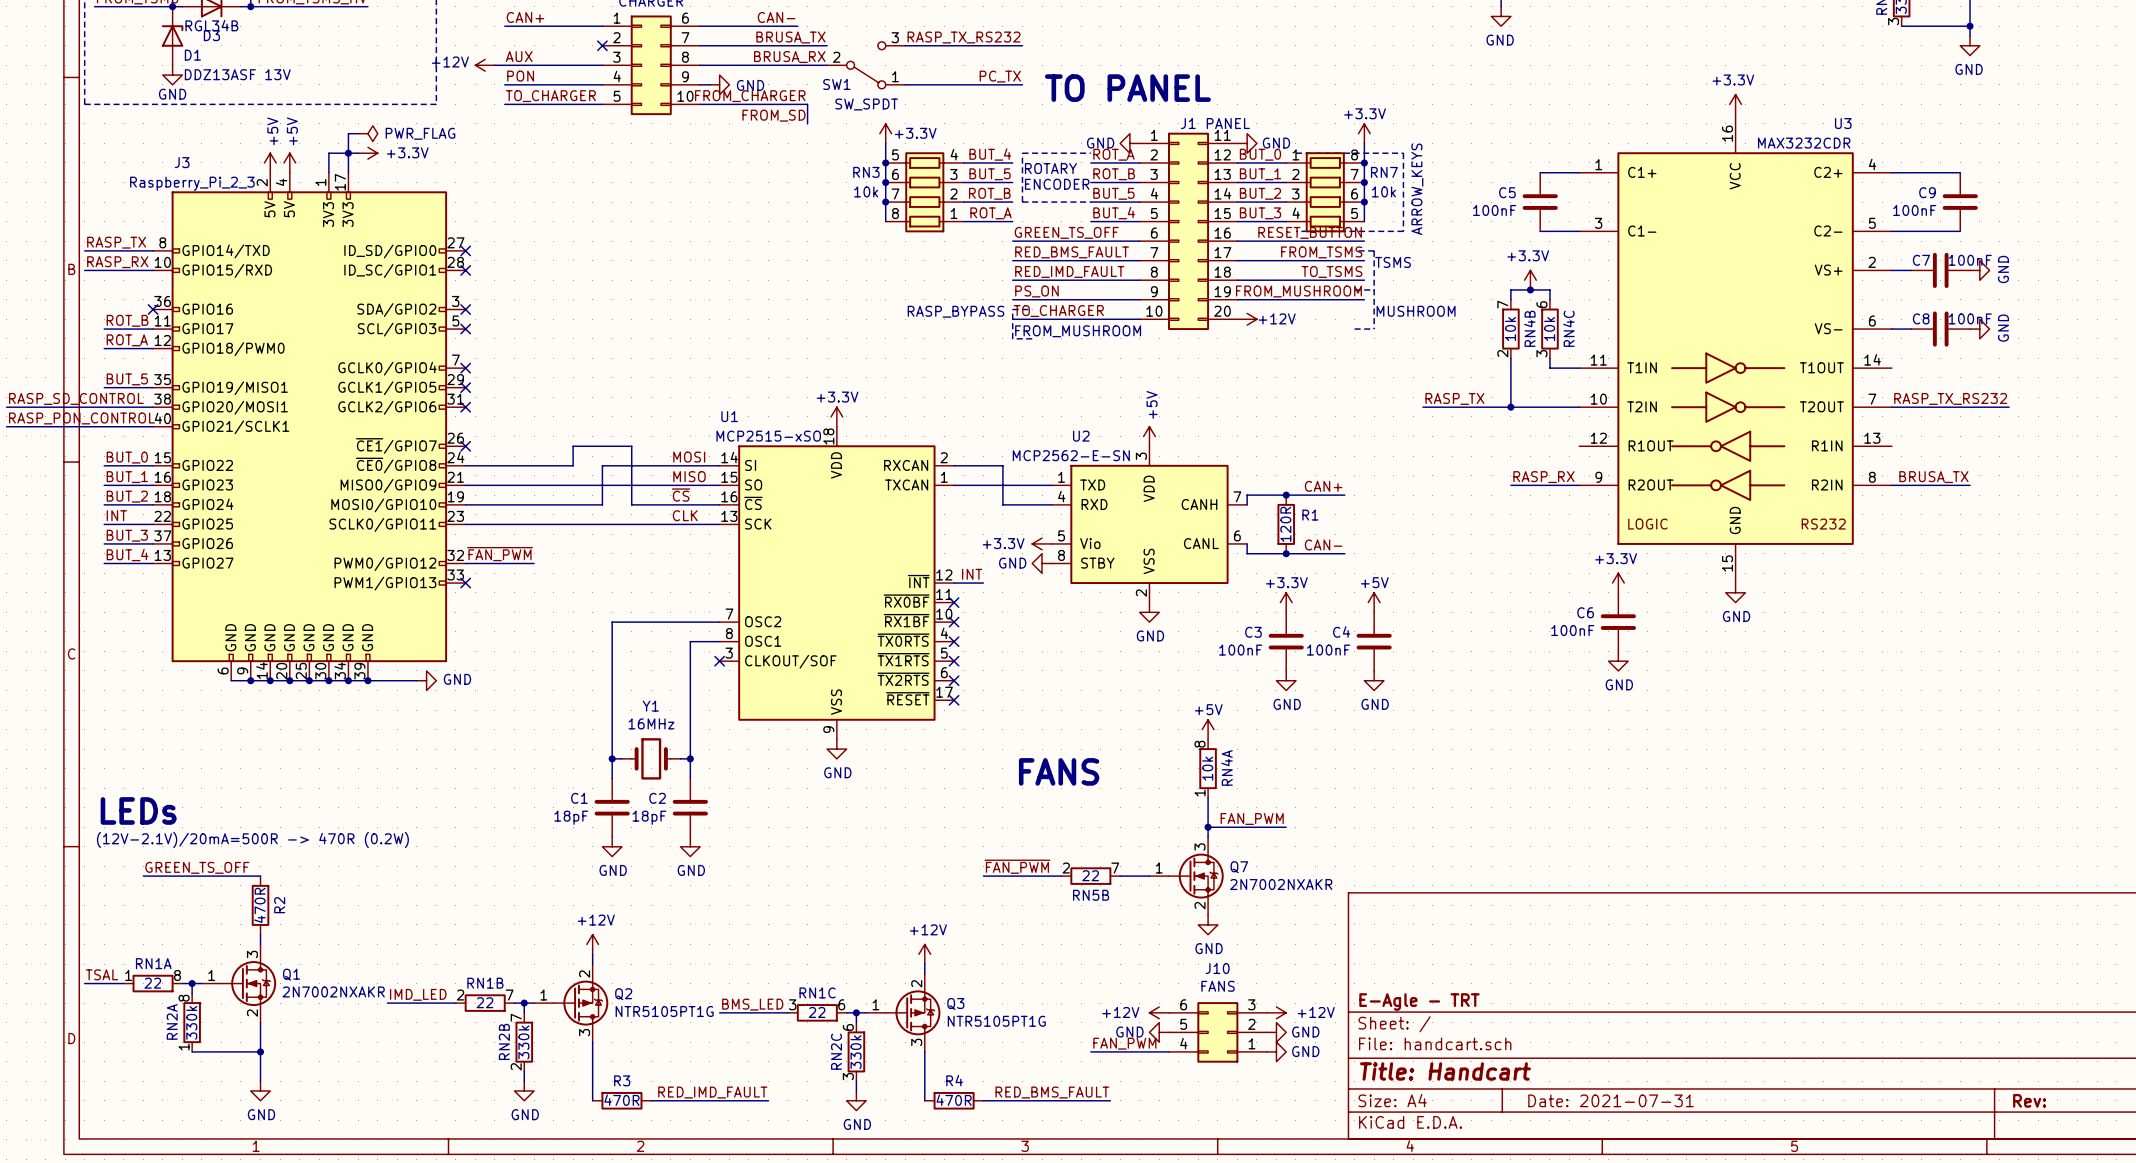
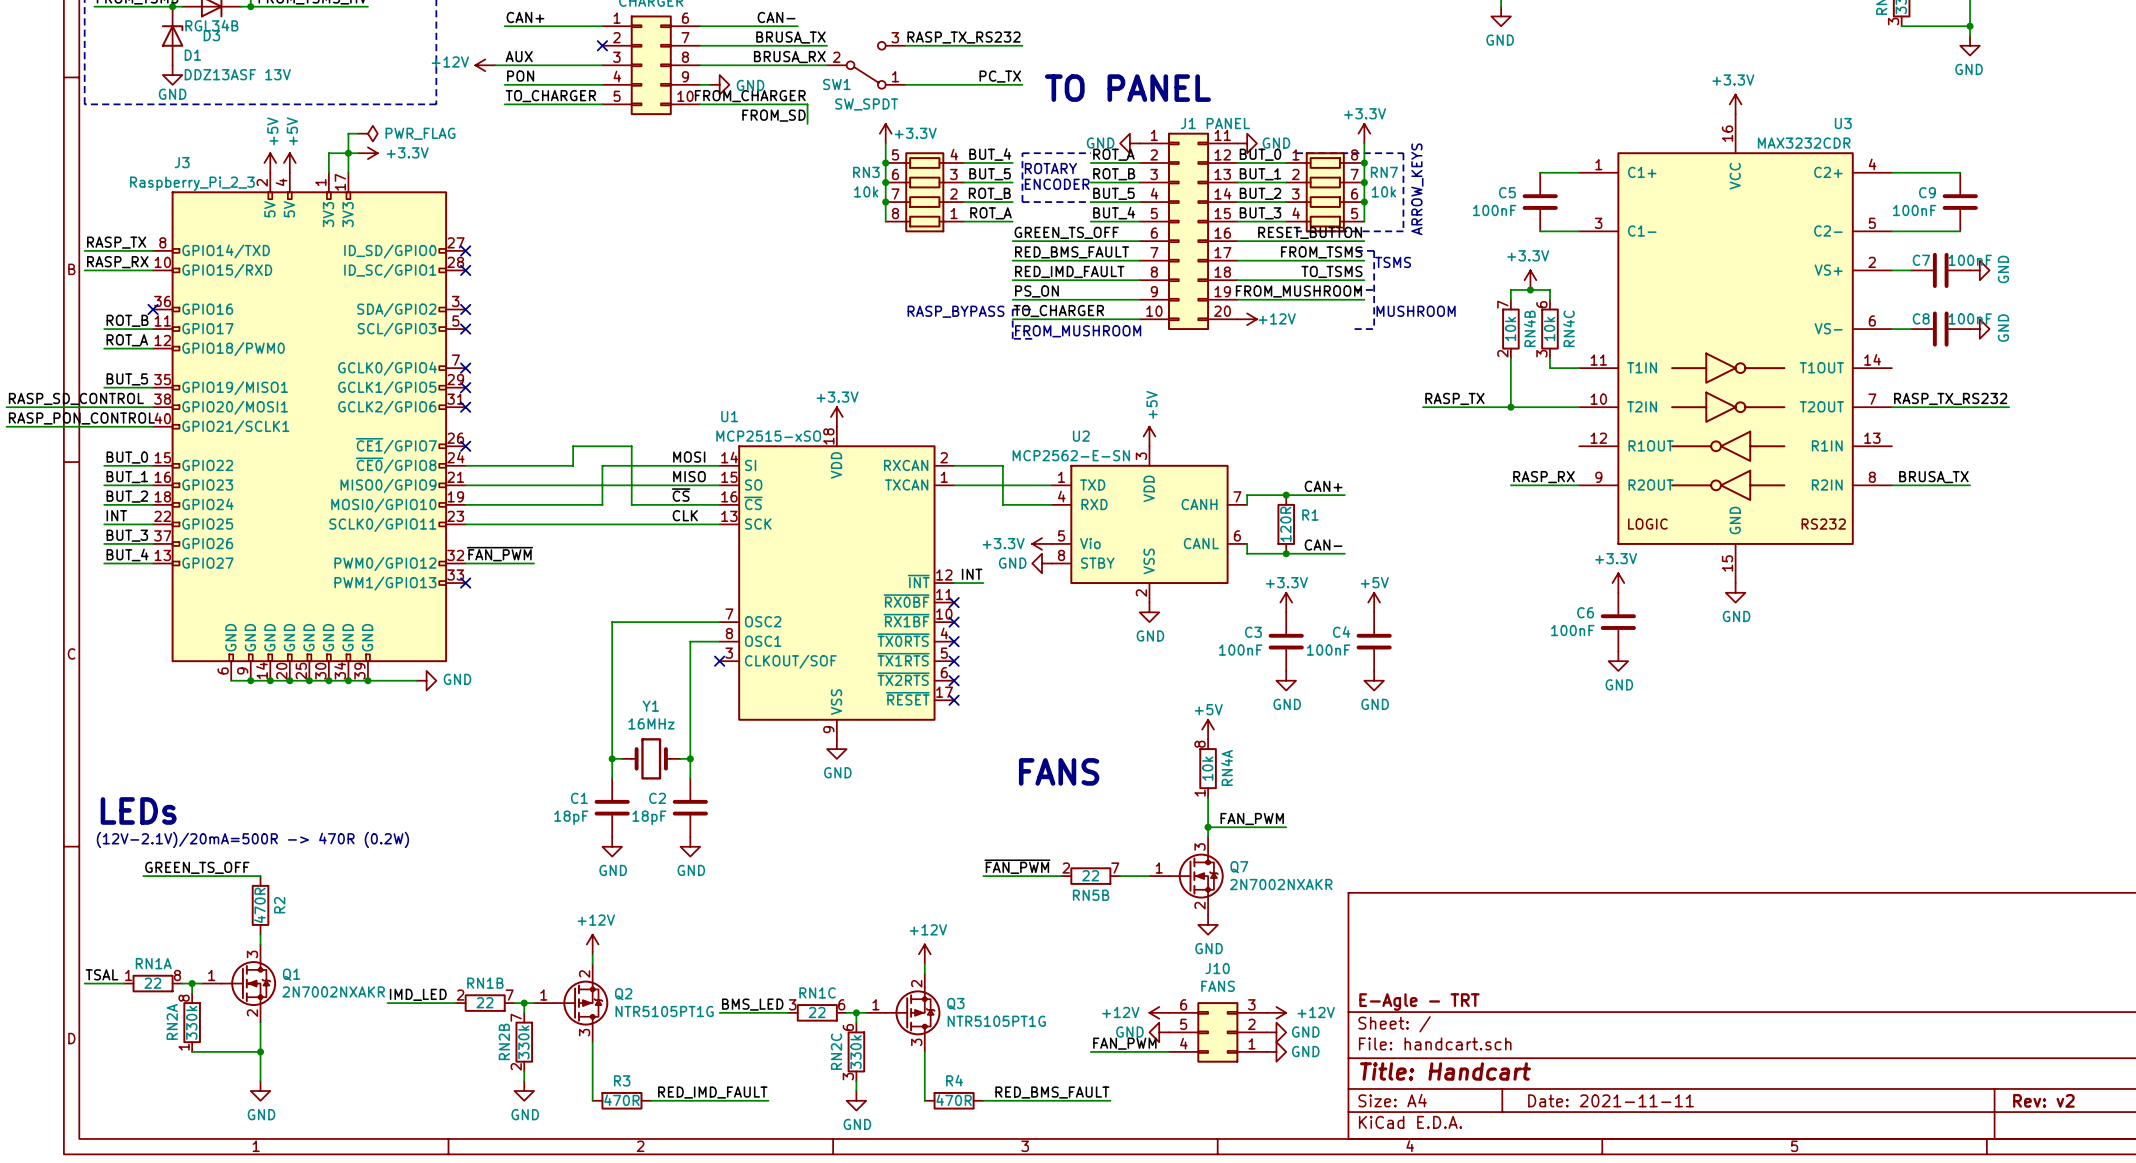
title block: Date: 2021-07-31 (1611, 1100) -> Date: 2021-11-11 (1611, 1100)
title block: Rev: (2029, 1100) -> Rev: v2 (2043, 1100)

